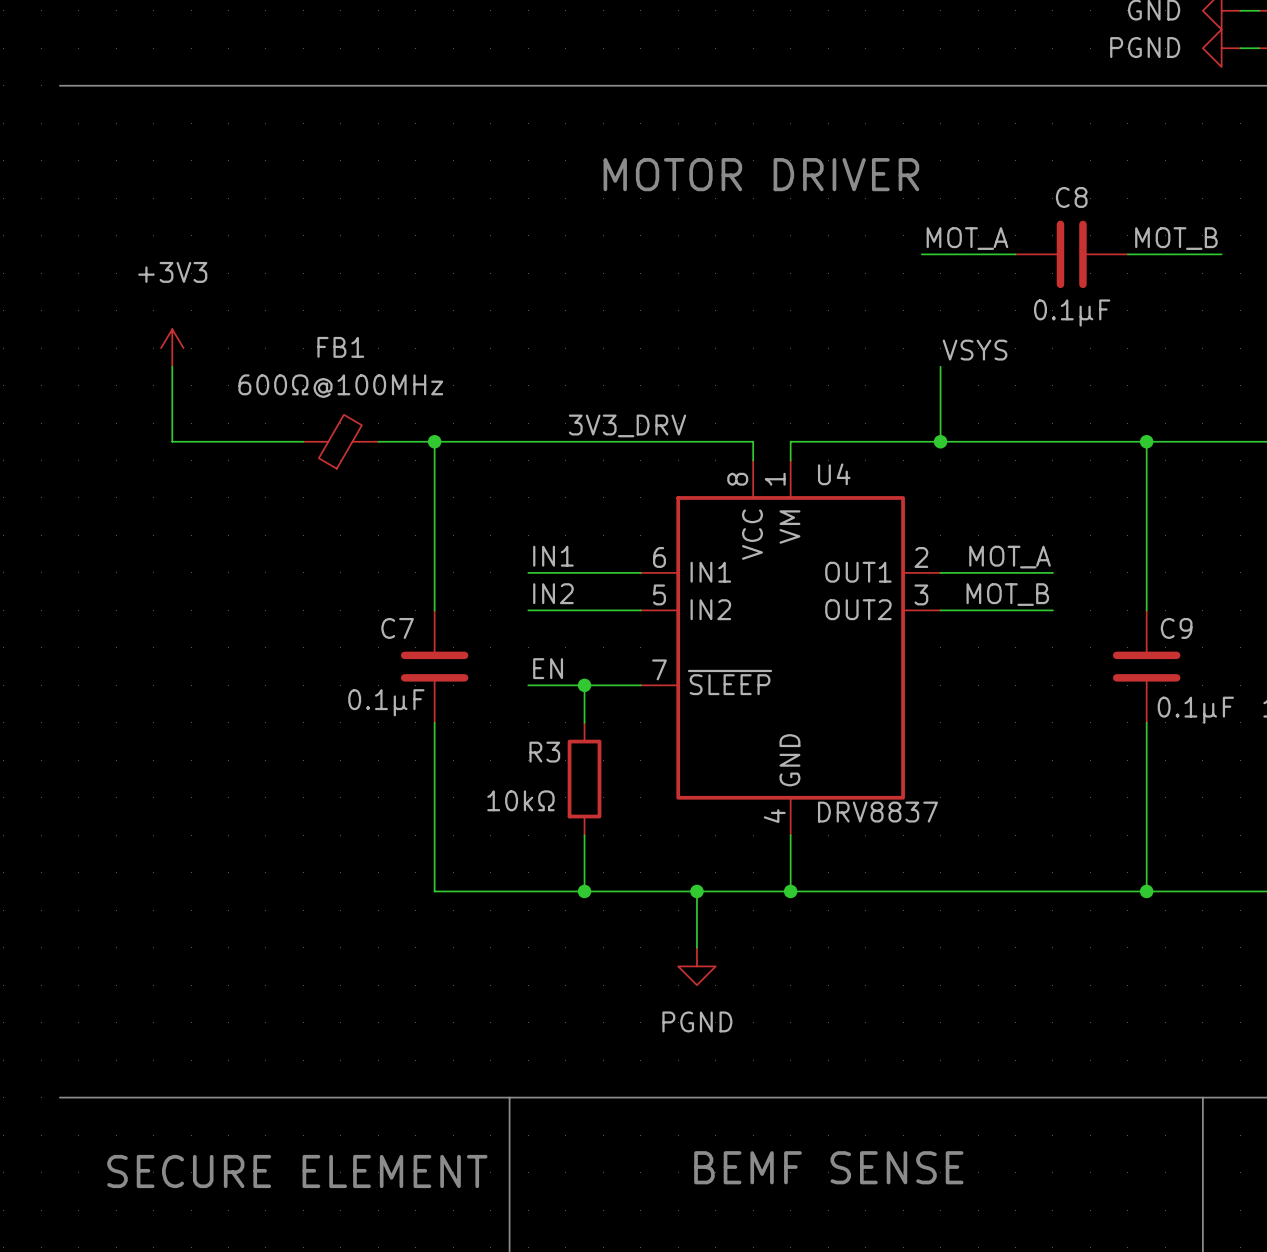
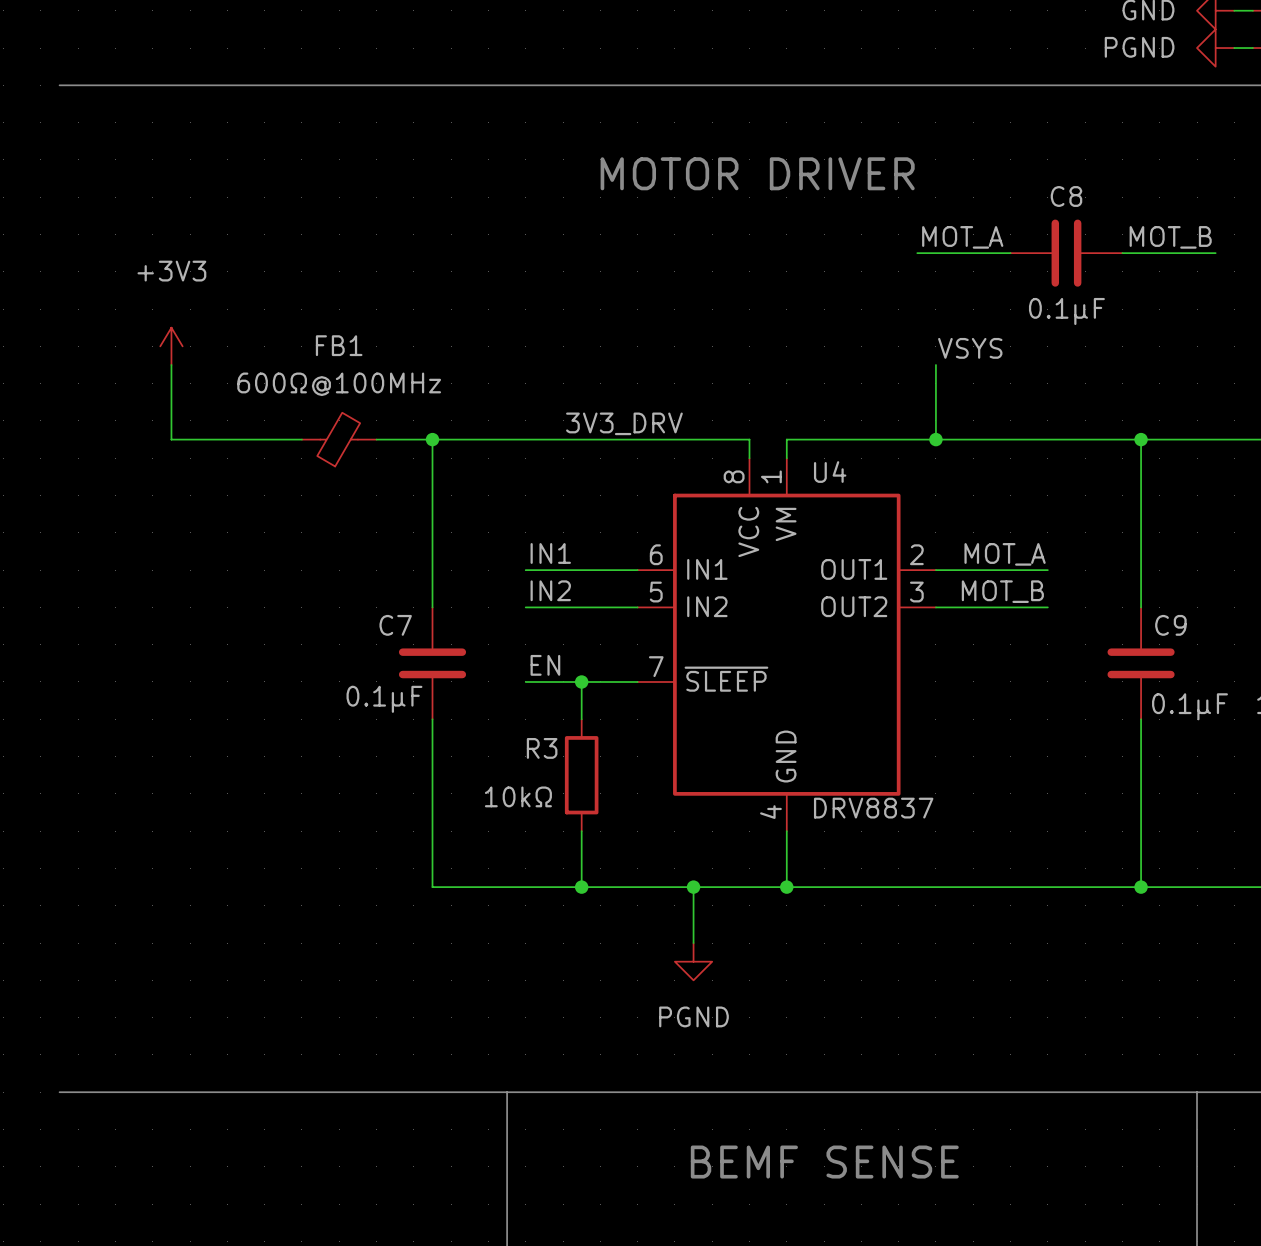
text: SECURE ELEMENT (297, 1171) -> none

